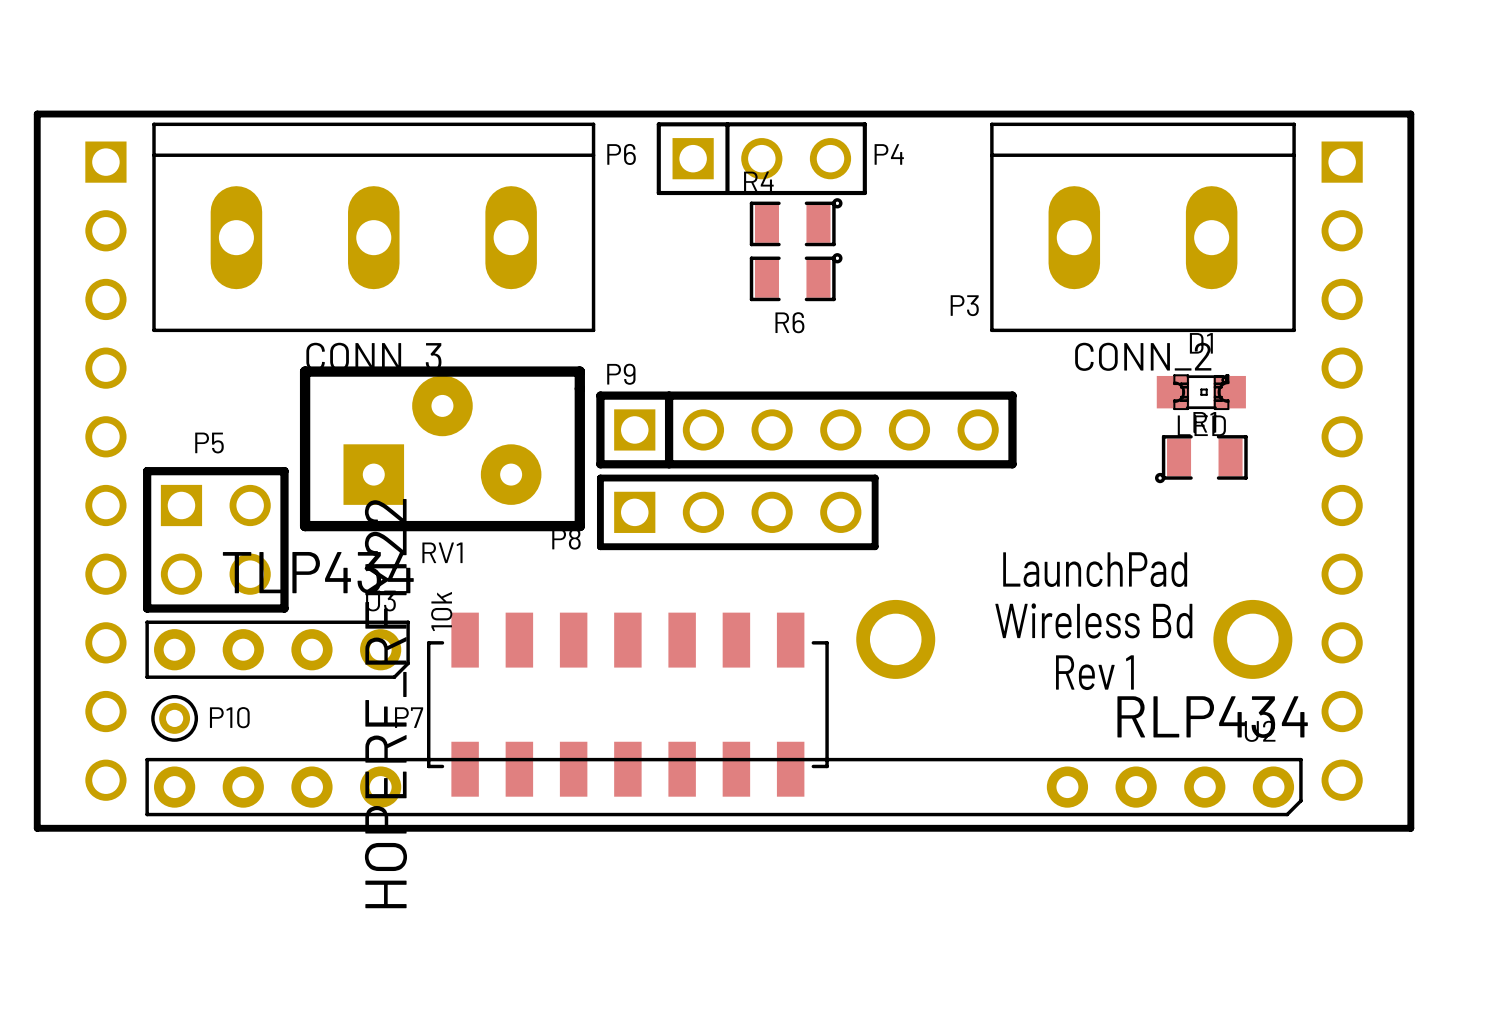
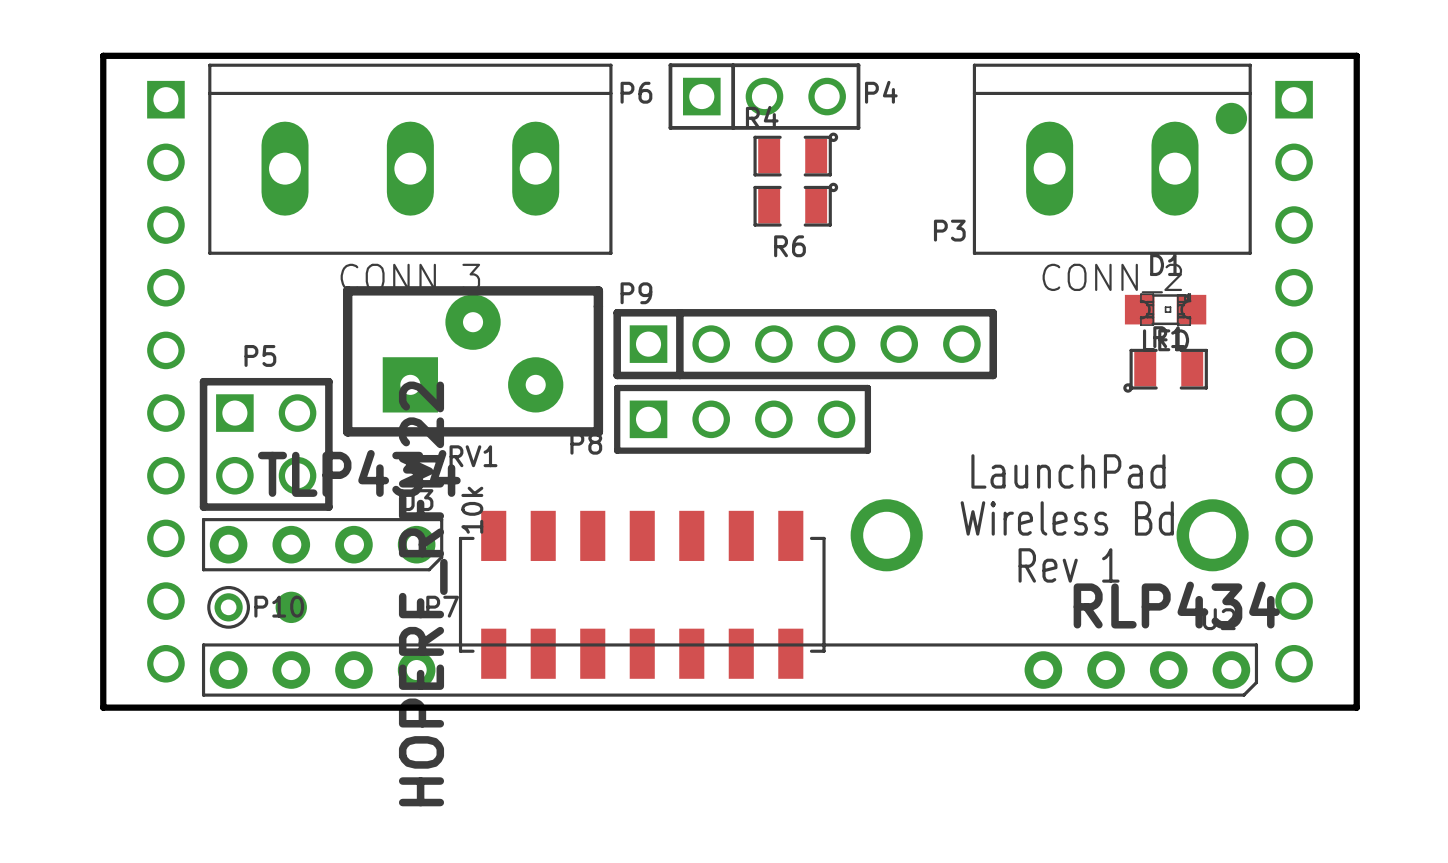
part: none -> (1231, 118)
part: none -> (291, 607)

